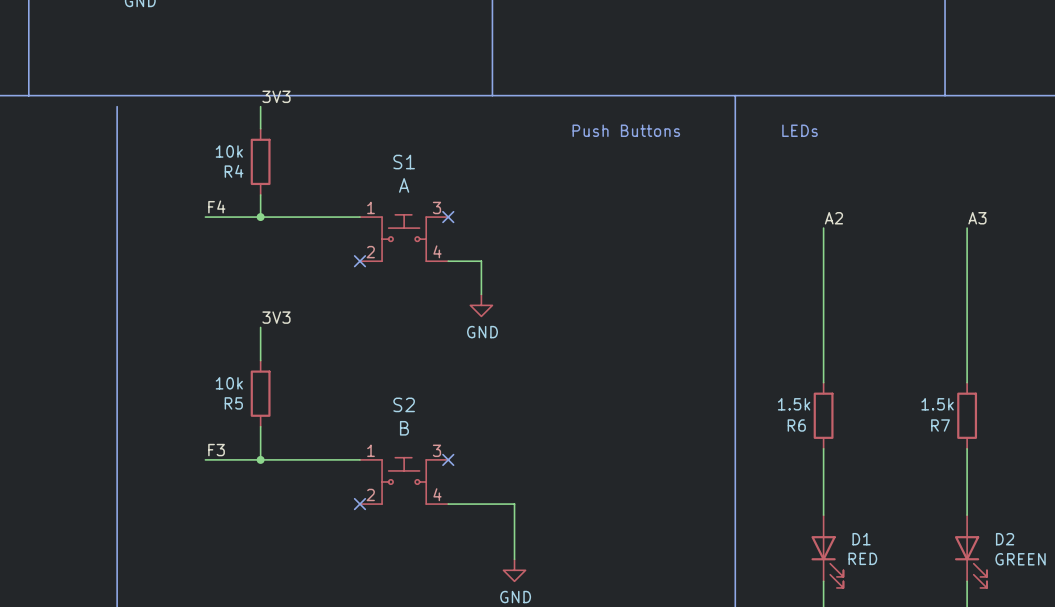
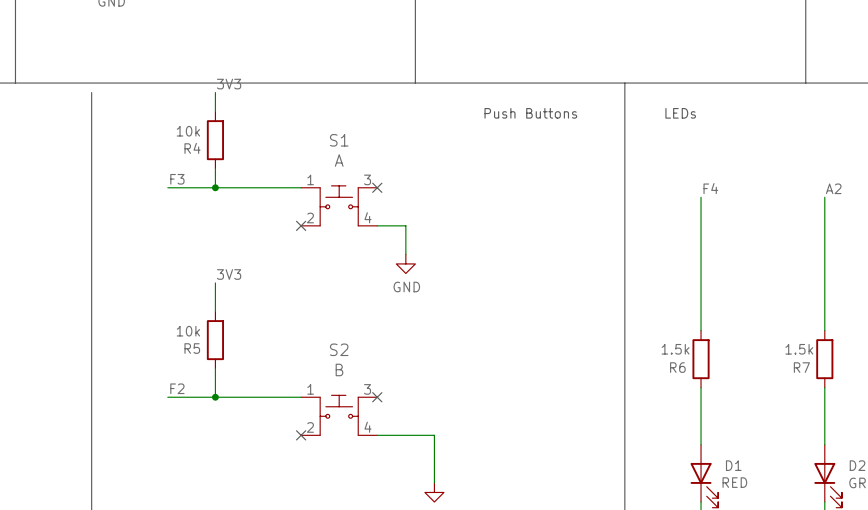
label: F4 (216, 206) -> F3 (177, 179)
label: A2 (833, 218) -> F4 (710, 188)
label: A3 (977, 218) -> A2 (833, 188)
label: F3 (216, 450) -> F2 (177, 388)

